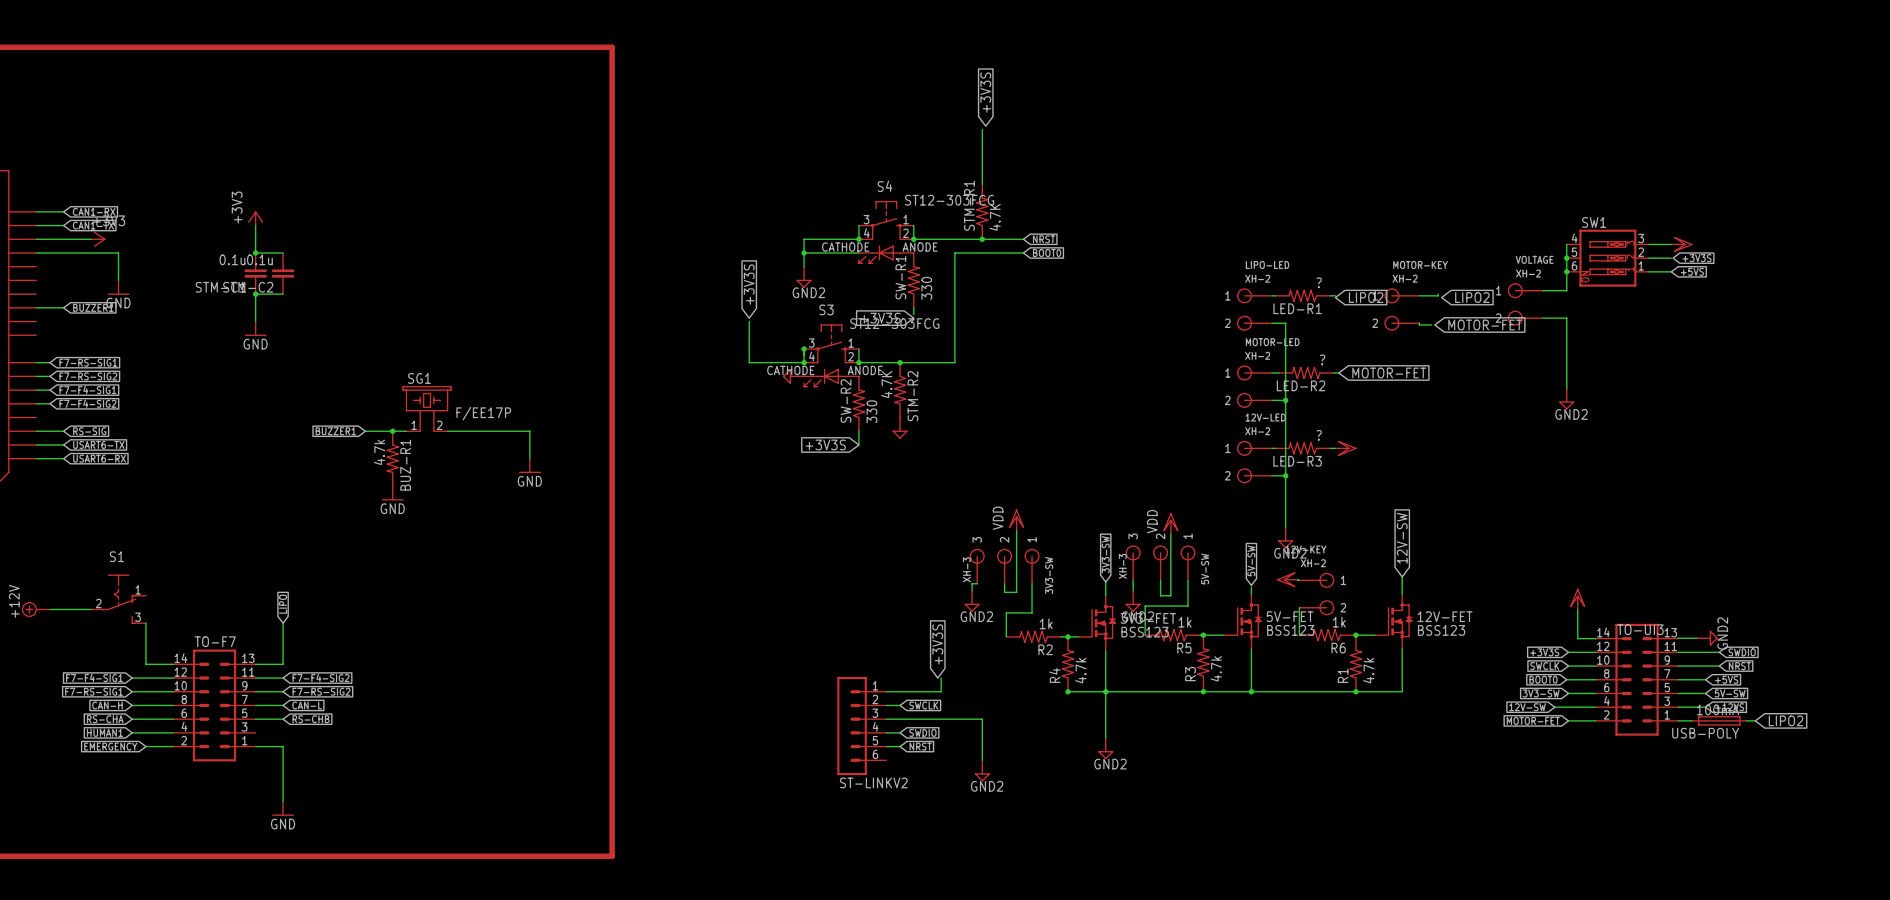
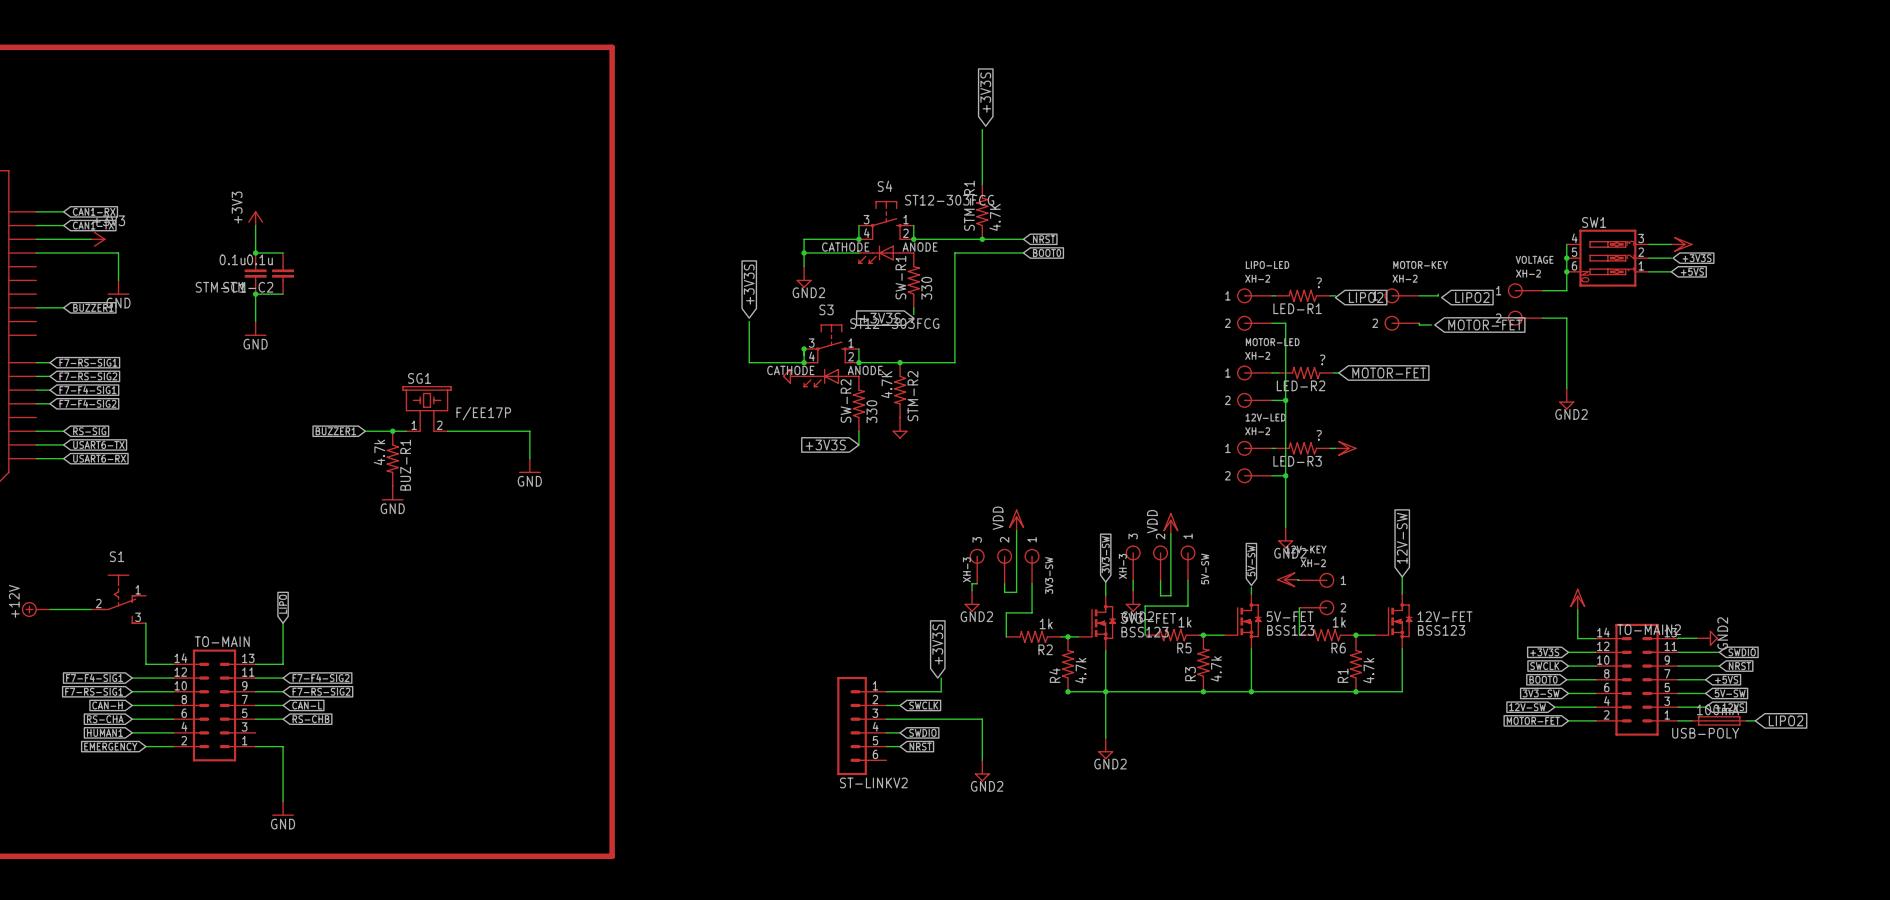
TO-UI3 name: TO-UI3 (1640, 629) -> TO-MAIN2 (1649, 629)
TO-F7 name: TO-F7 (215, 641) -> TO-MAIN (222, 641)

